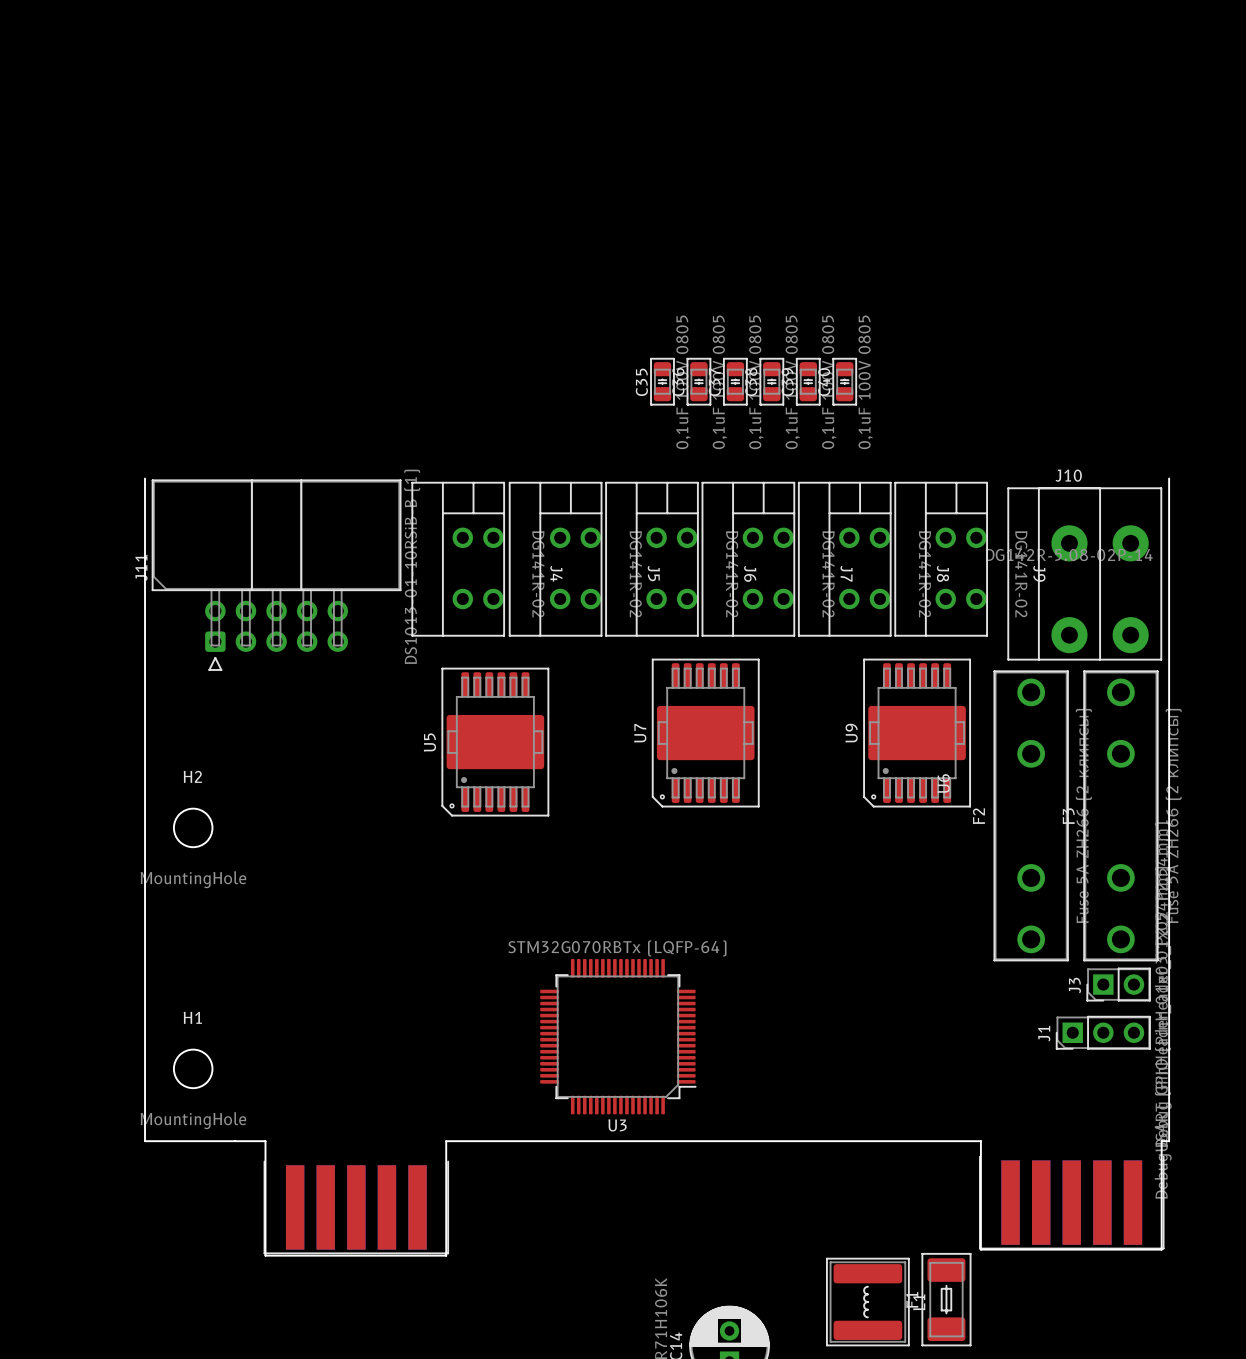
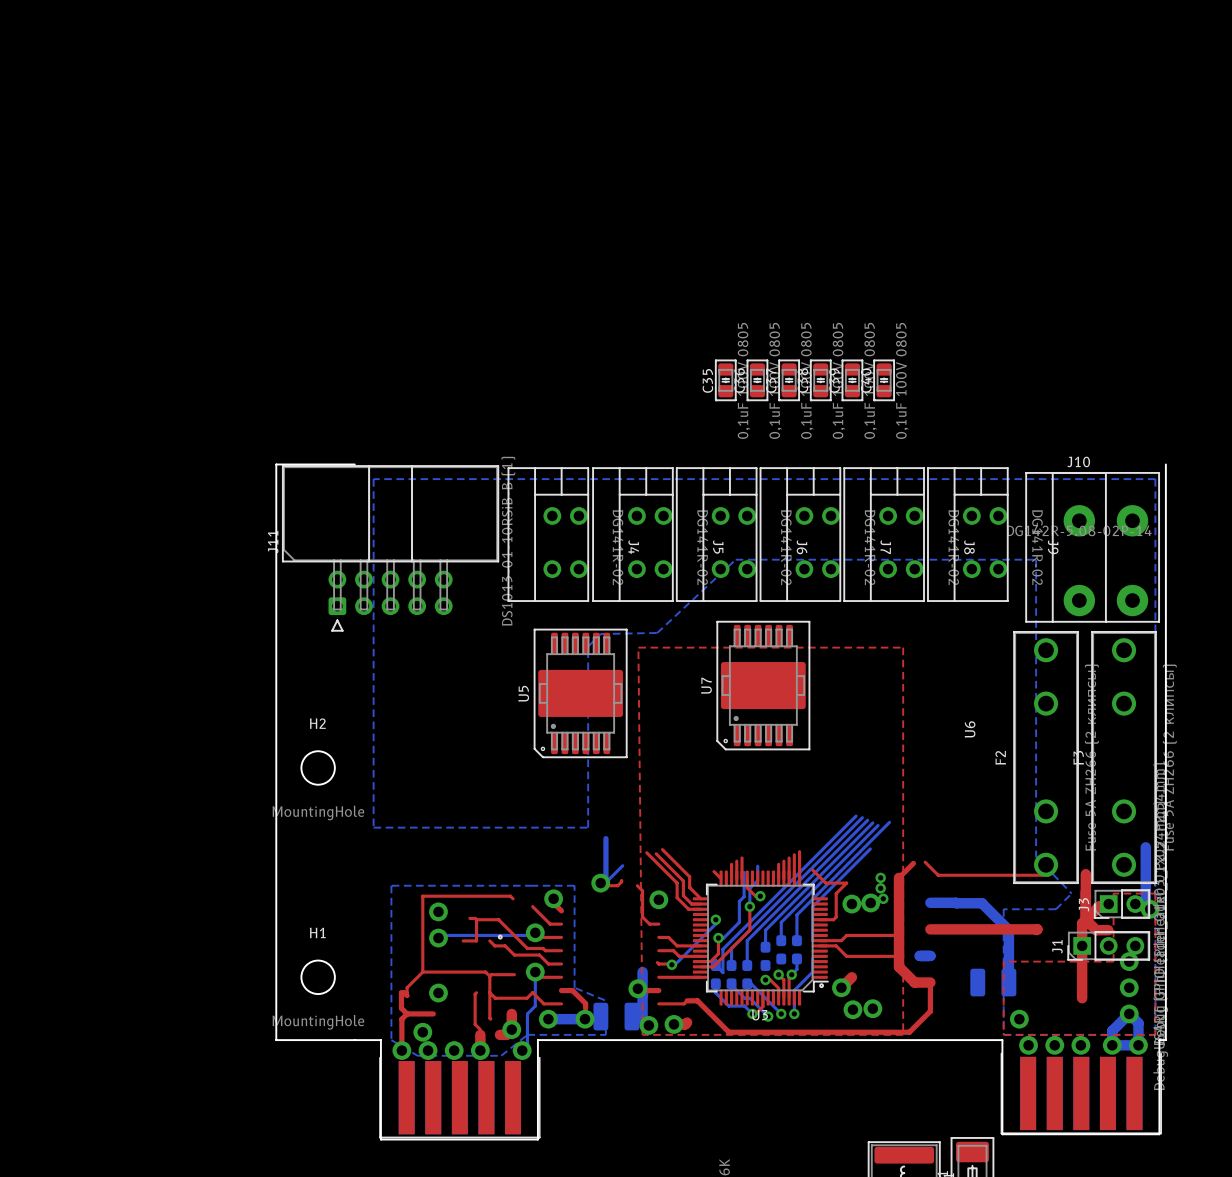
board edge: none -> (276, 464) (354, 464)
bottom zone outline: none -> (373, 479) (1155, 479) (1155, 1034) (1003, 1034) (1003, 909) (1055, 909) (1071, 893) (1036, 856) (1036, 559) (735, 559) (657, 632) (600, 634) (588, 646) (588, 827) (373, 827) (373, 479)
top zone outline: none -> (638, 647) (903, 647) (903, 1034) (642, 1034) (638, 647)
U9: (917, 733) -> none
bottom track: none -> (856, 816) (722, 949) (722, 972) (715, 965) (715, 960)
bottom track: none -> (862, 817) (731, 948) (731, 965)
bottom track: none -> (867, 820) (747, 940) (747, 965)
bottom track: none -> (889, 822) (796, 914) (796, 940)
bottom track: none -> (872, 822) (765, 930) (765, 947)
bottom track: none -> (878, 825) (781, 922) (781, 940)
bottom track: none -> (605, 838) (605, 880)
bottom track: none -> (1145, 847) (1145, 904) (1150, 909)
top track: none -> (662, 849) (689, 876) (689, 887) (700, 898)
bottom track: none -> (870, 848) (812, 906) (812, 940)
top track: none -> (799, 851) (799, 878)
top track: none -> (646, 852) (677, 883) (677, 897) (688, 909) (700, 909)
top track: none -> (656, 853) (683, 881) (683, 895) (691, 904) (700, 904)
top track: none -> (794, 854) (794, 878)
top track: none -> (742, 857) (742, 878)
top track: none -> (789, 857) (789, 878)
top track: none -> (736, 861) (736, 878)
top track: none -> (783, 861) (783, 878)
top track: none -> (925, 862) (938, 875) (1048, 875) (1055, 867)
top track: none -> (913, 863) (899, 877) (899, 966) (914, 982) (930, 982) (930, 1011) (909, 1032) (728, 1032) (697, 1000) (687, 1000) (684, 1003) (658, 1003)
top track: none -> (731, 864) (731, 878)
top track: none -> (778, 864) (778, 878)
bottom track: none -> (622, 865) (605, 883) (600, 883)
bottom track: none -> (757, 866) (757, 880) (749, 888) (749, 906)
top track: none -> (812, 870) (825, 883) (846, 883) (836, 893) (836, 917) (833, 919) (819, 919)
top track: none -> (714, 871) (721, 878)
U3 value: STM32G070RBTx (LQFP-64) (617, 948) -> none
bottom track: none -> (744, 872) (744, 896) (739, 901) (739, 922) (723, 938) (718, 938)
top track: none -> (1085, 874) (1085, 919) (1096, 930) (1108, 930)
via: none -> (880, 877)
top track: none -> (747, 878) (747, 887) (755, 896) (760, 896)
top track: none -> (621, 880) (617, 885) (603, 885) (600, 883)
via: none -> (600, 883)
bottom zone outline: none -> (391, 885) (391, 1040) (417, 1055) (501, 1055) (527, 1034) (605, 1034) (604, 1000) (574, 987) (574, 885) (391, 885)
top track: none -> (637, 885) (642, 890) (642, 917) (649, 924) (658, 924)
via: none -> (880, 888)
top zone outline: none -> (1113, 893) (1155, 893) (1155, 1034) (1003, 1034) (1003, 961) (1113, 961) (1113, 893)
via: none -> (760, 896)
top track: none -> (513, 898) (510, 896) (422, 896) (422, 972)
via: none -> (553, 898)
via: none -> (883, 898)
top track: none -> (554, 899) (554, 903) (561, 910)
via: none -> (658, 899)
via: none -> (870, 902)
bottom track: none -> (930, 902) (981, 903) (1008, 930) (1008, 982)
via: none -> (851, 904)
top track: none -> (532, 906) (550, 924) (561, 924)
top track: none -> (749, 906) (749, 930) (713, 966) (700, 966)
via: none -> (749, 906)
top track: none -> (1110, 906) (1098, 906) (1082, 923) (1082, 998)
via: none -> (1150, 909)
via: none -> (438, 911)
top track: none -> (469, 918) (476, 919)
top track: none -> (476, 919) (498, 919) (527, 948) (561, 950)
top track: none -> (476, 919) (476, 940) (463, 940)
bottom track: none -> (715, 919) (715, 923) (675, 964) (671, 964)
via: none -> (715, 919)
top track: none -> (930, 929) (1036, 930)
top track: none -> (535, 932) (540, 938) (561, 937)
bottom track: none -> (535, 932) (532, 935) (441, 935) (438, 938)
via: none -> (535, 932)
drawing: none -> [497, 934, 503, 940]
top track: none -> (899, 935) (846, 935) (841, 940) (819, 940)
top track: none -> (658, 937) (668, 937) (677, 945) (700, 945)
via: none -> (438, 938)
top track: none -> (718, 938) (718, 953) (710, 961) (700, 961)
via: none -> (718, 938)
top track: none -> (489, 940) (494, 945) (505, 945) (514, 955) (539, 955) (548, 964) (561, 964)
top track: none -> (819, 945) (836, 945) (846, 956) (899, 956)
U3 position: (618, 1036) -> (760, 938)
part: none -> (781, 949)
part: none -> (796, 949)
top track: none -> (658, 950) (673, 950) (679, 956) (700, 956)
part: none -> (765, 956)
bottom track: none -> (919, 955) (930, 955)
bottom track: none -> (796, 958) (796, 969) (791, 974)
bottom track: none -> (812, 958) (812, 972) (794, 990) (794, 1013)
via: none -> (1129, 961)
top track: none -> (657, 962) (671, 964)
via: none -> (671, 964)
top track: none -> (422, 972) (485, 972) (489, 976)
top track: none -> (422, 972) (407, 987) (407, 995) (401, 993) (401, 1008) (407, 1013)
top track: none -> (535, 972) (540, 977) (561, 977)
bottom track: none -> (535, 972) (535, 1006) (527, 1013) (527, 1045) (522, 1050) (514, 1050)
via: none -> (535, 972)
bottom track: none -> (642, 972) (642, 1019) (648, 1025)
top track: none -> (514, 974) (491, 974) (489, 976)
part: none -> (715, 974)
part: none -> (731, 974)
part: none -> (747, 974)
top track: none -> (778, 974) (783, 979) (783, 997)
via: none -> (778, 974)
top track: none -> (791, 974) (789, 977) (789, 997)
via: none -> (791, 974)
top track: none -> (489, 976) (489, 992)
top track: none -> (658, 977) (700, 977)
top track: none -> (851, 977) (841, 987)
top track: none -> (765, 979) (770, 979) (778, 988) (778, 997)
via: none -> (765, 979)
part: none -> (993, 982)
drawing: none -> [819, 983, 824, 988]
bottom track: none -> (715, 983) (715, 993) (728, 1006) (744, 1006) (752, 1013)
bottom track: none -> (731, 983) (744, 998) (749, 998) (768, 1016)
bottom track: none -> (747, 983) (751, 983) (781, 1013)
via: none -> (841, 987)
via: none -> (1129, 987)
top track: none -> (637, 988) (639, 990) (658, 990)
via: none -> (637, 988)
top track: none -> (561, 990) (572, 990) (585, 1003) (585, 1008)
via: none -> (438, 993)
top track: none -> (476, 992) (475, 1024) (480, 1029)
top track: none -> (489, 992) (495, 998) (527, 998) (532, 992) (543, 1003) (561, 1003)
top track: none -> (489, 992) (490, 1019)
top track: none -> (762, 997) (762, 1006) (755, 1013) (752, 1013)
via: none -> (872, 1008)
via: none -> (852, 1009)
top track: none -> (407, 1013) (433, 1013)
top track: none -> (407, 1013) (401, 1019) (401, 1050) (407, 1044)
top track: none -> (511, 1013) (511, 1029) (506, 1034) (499, 1034)
via: none -> (752, 1013)
via: none -> (781, 1013)
via: none -> (794, 1013)
bottom track: none -> (1129, 1013) (1112, 1030) (1112, 1045) (1138, 1045) (1138, 1023) (1129, 1013)
via: none -> (1129, 1013)
part: none -> (616, 1016)
via: none -> (768, 1016)
bottom track: none -> (548, 1019) (585, 1019)
via: none -> (548, 1019)
via: none -> (585, 1019)
via: none -> (1019, 1019)
top track: none -> (687, 1022) (685, 1024) (673, 1024)
via: none -> (673, 1024)
via: none -> (648, 1025)
via: none -> (511, 1029)
via: none -> (422, 1032)
top track: none -> (480, 1034) (480, 1050)
via: none -> (1028, 1045)
via: none -> (1054, 1045)
via: none -> (1080, 1045)
via: none -> (1112, 1045)
via: none -> (1138, 1045)
via: none -> (401, 1050)
via: none -> (428, 1050)
via: none -> (454, 1050)
via: none -> (480, 1050)
via: none -> (522, 1050)

